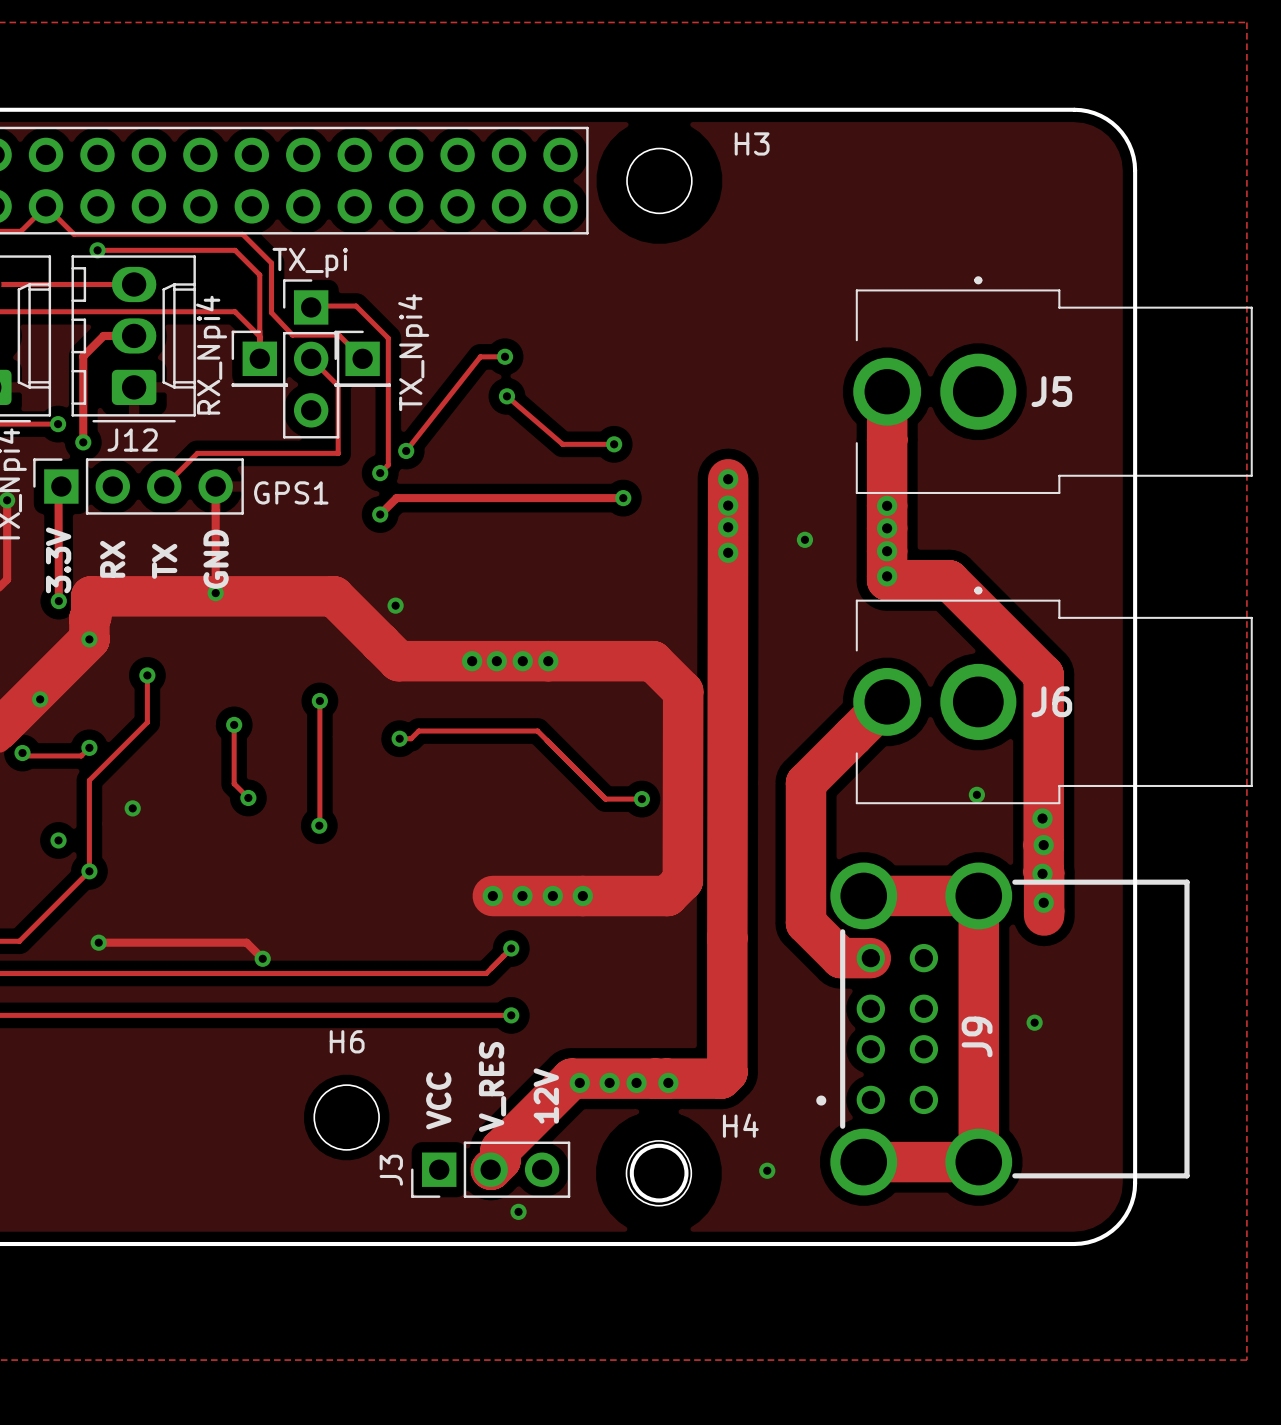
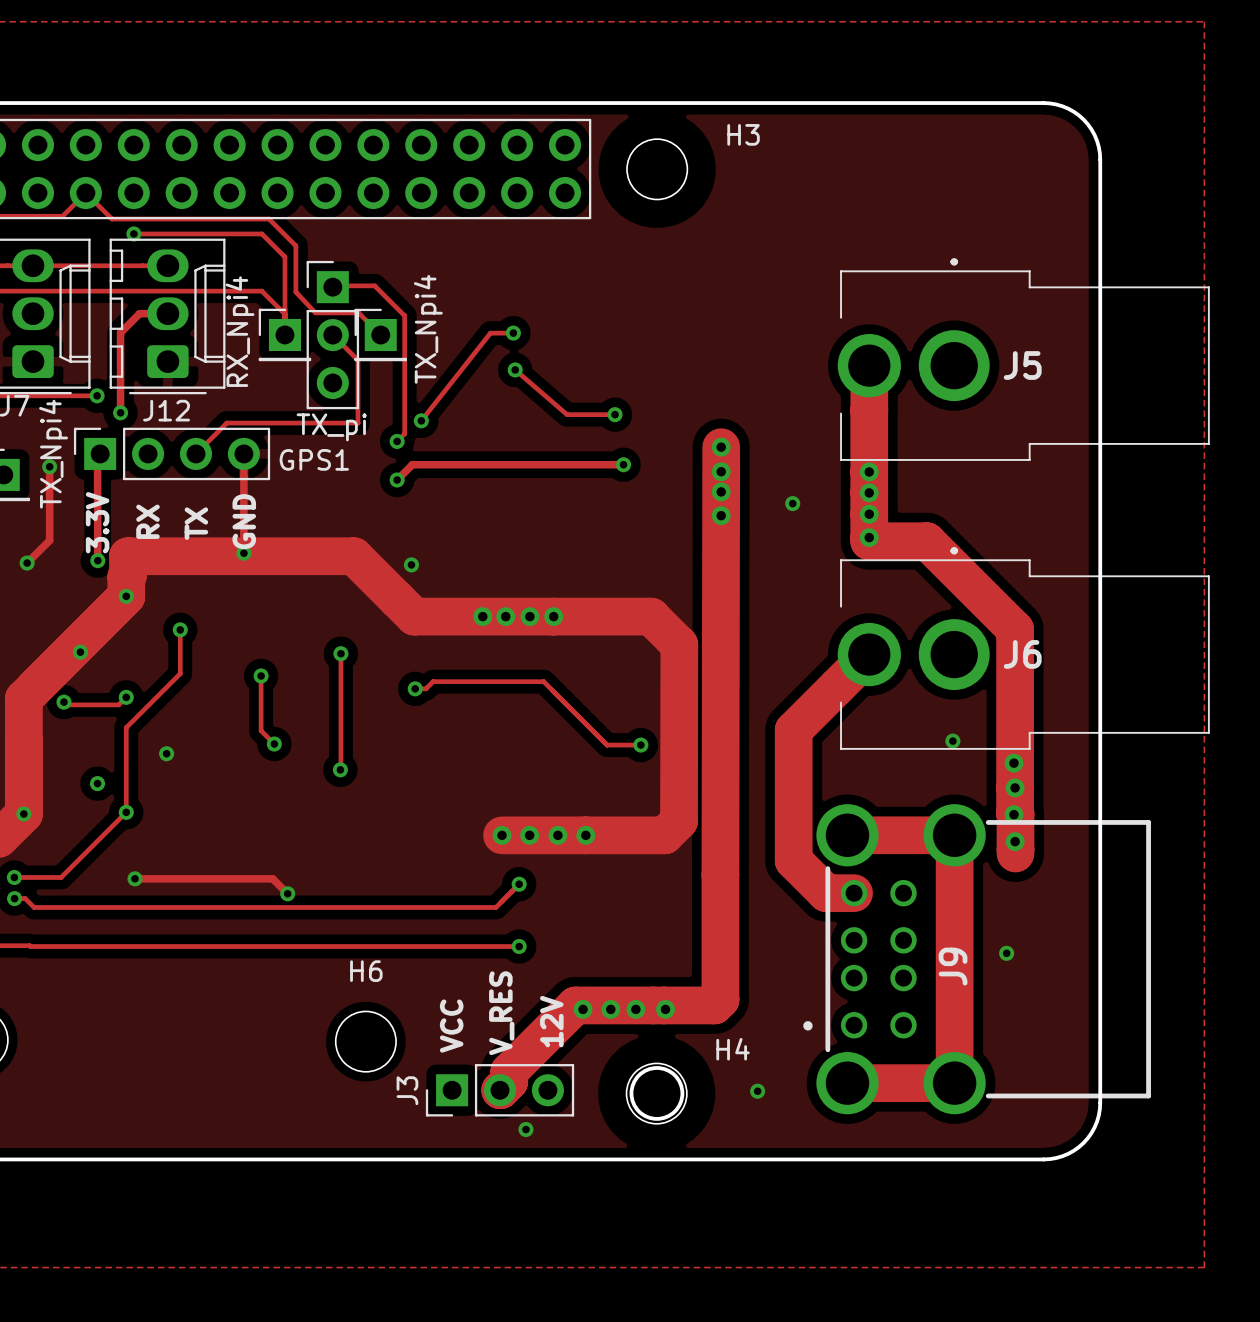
TX_pi name position: TX_pi (310, 262) -> TX_pi (331, 427)

